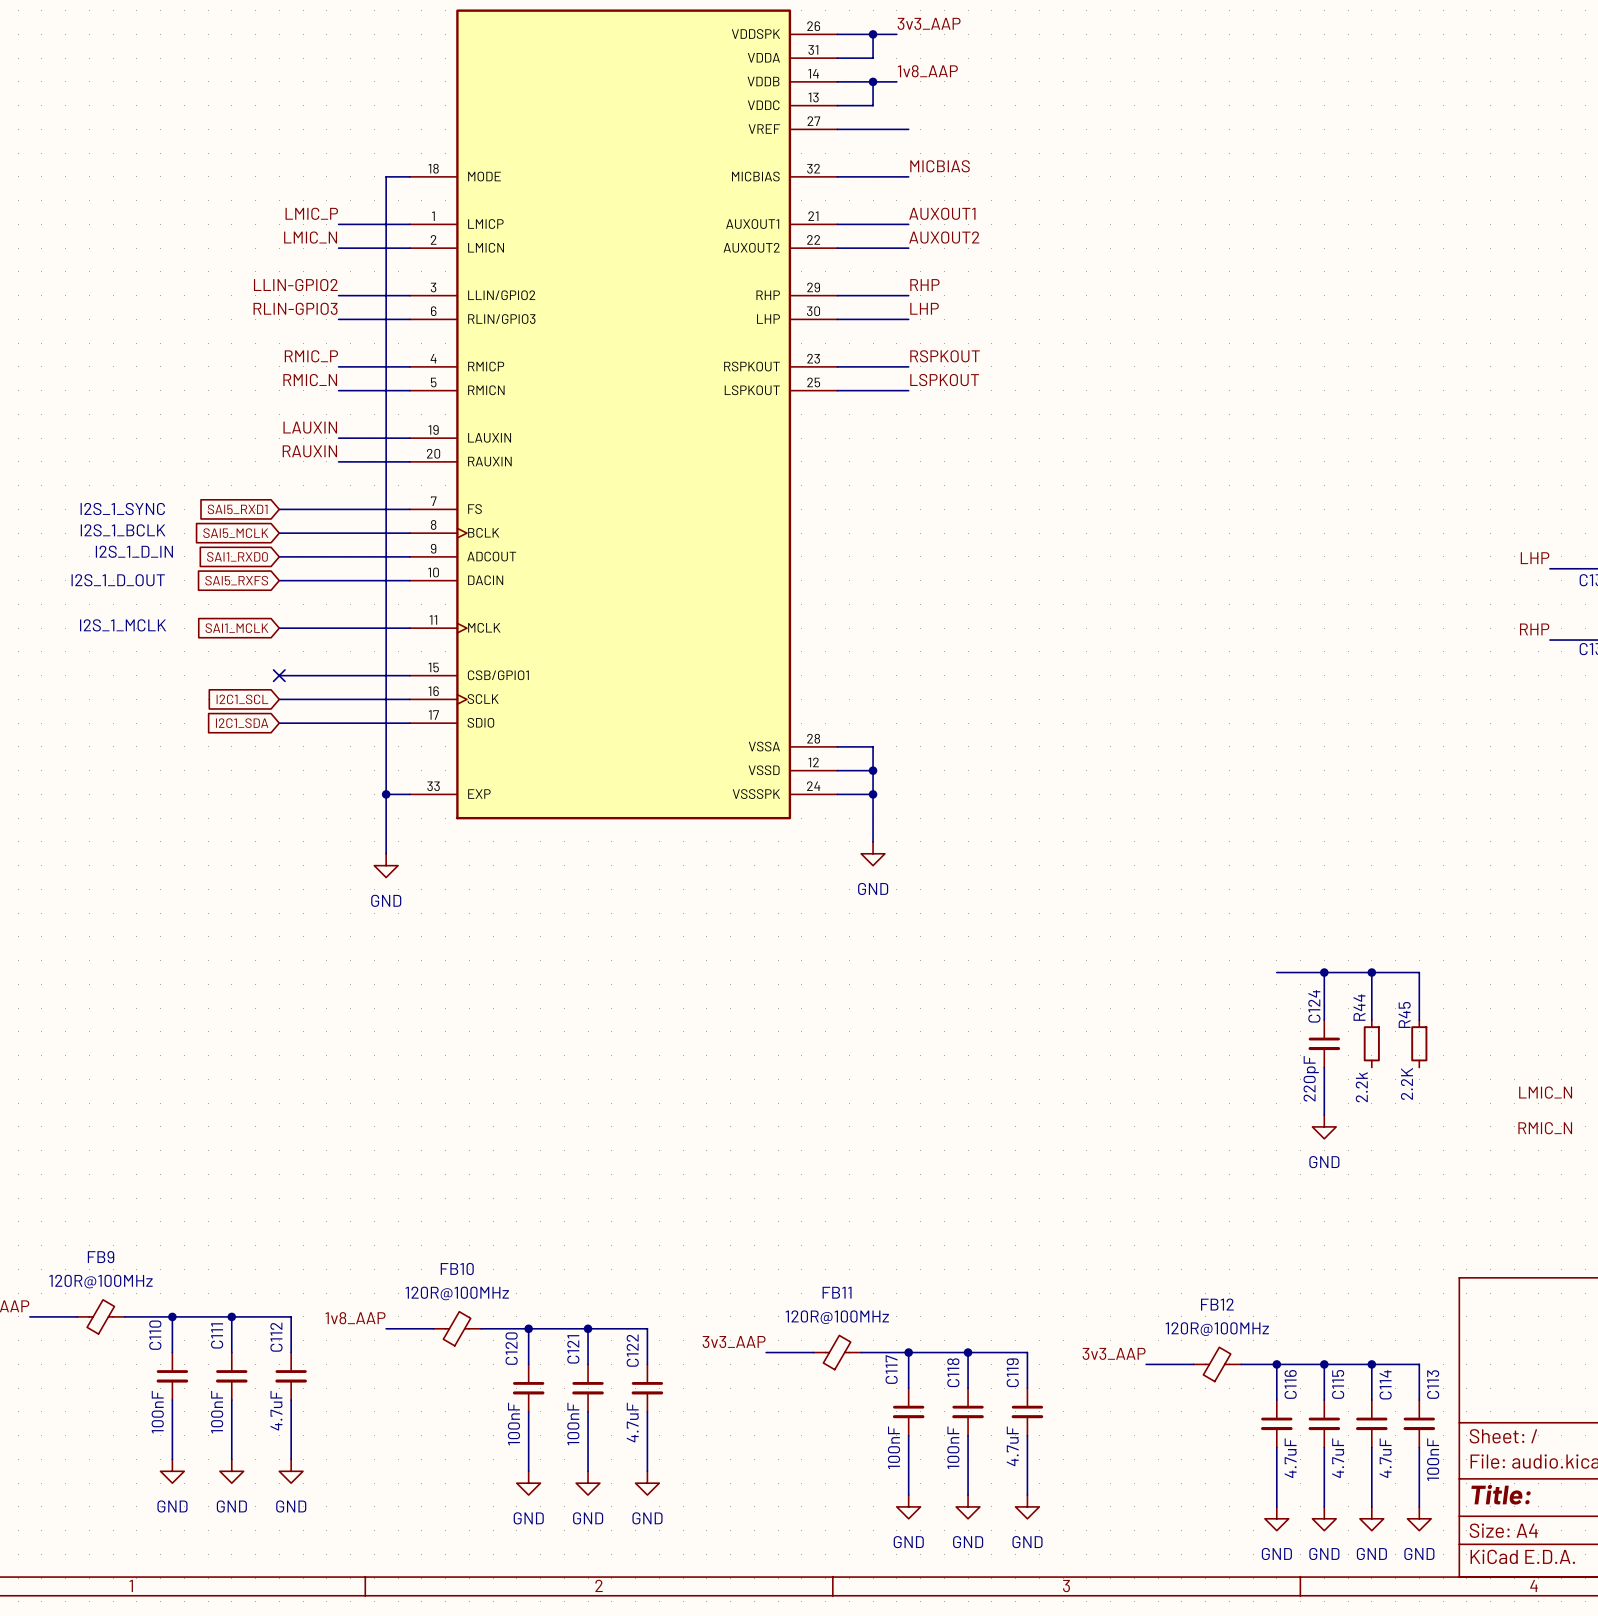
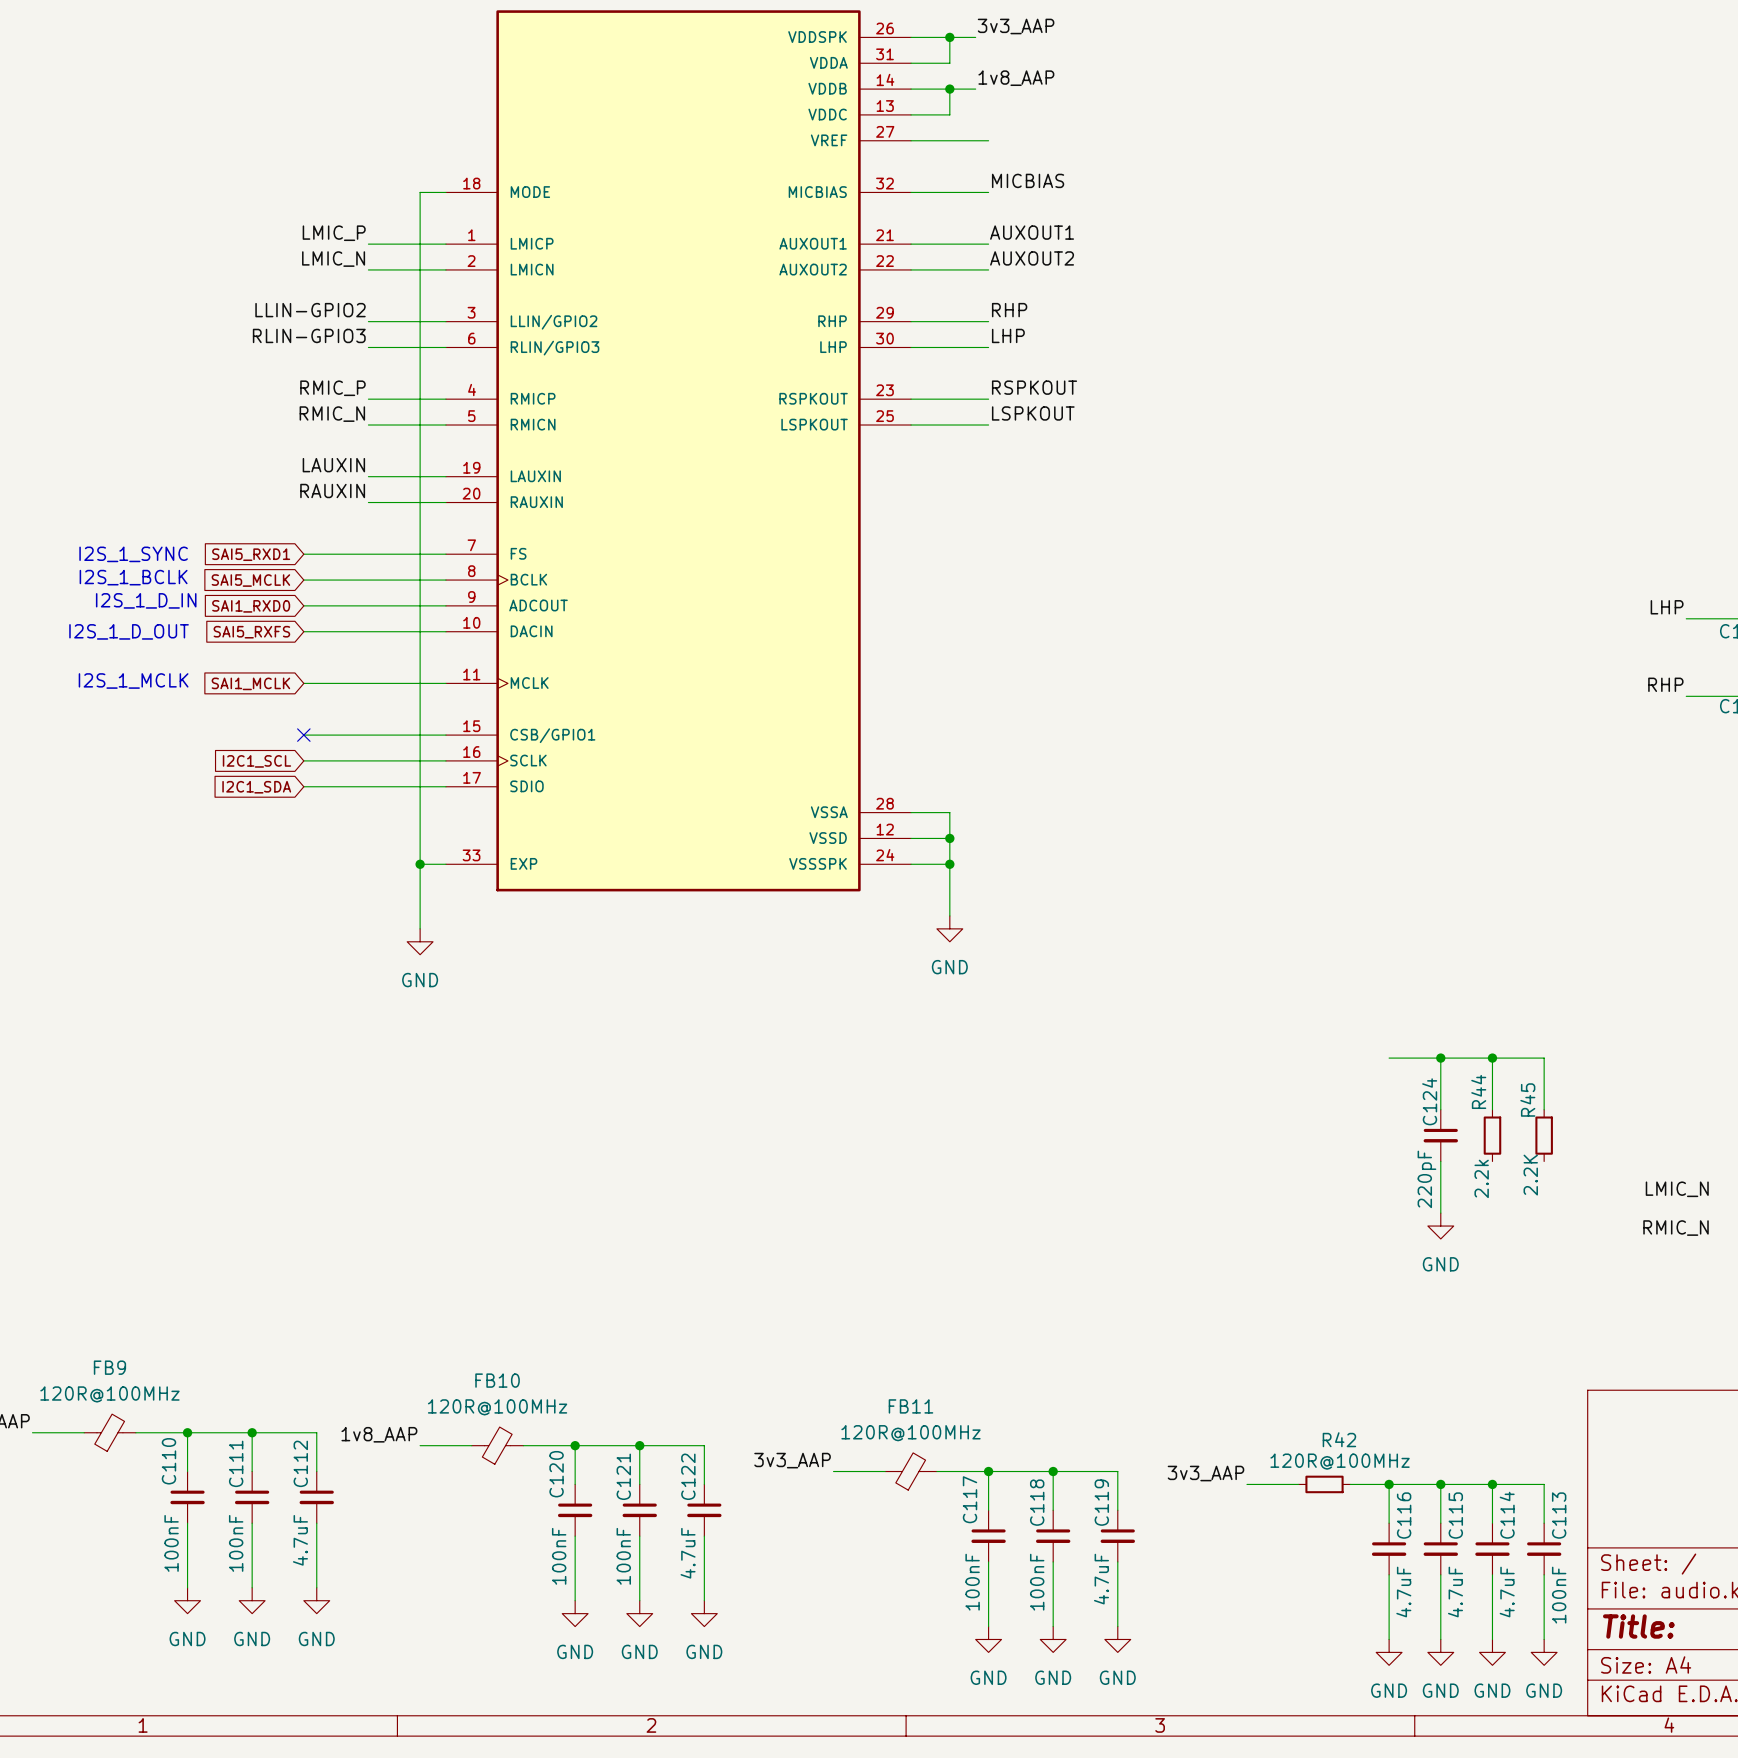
FB12: 120R@100MHz (1217, 1364) -> none
R42: none -> 120R@100MHz (1324, 1484)

